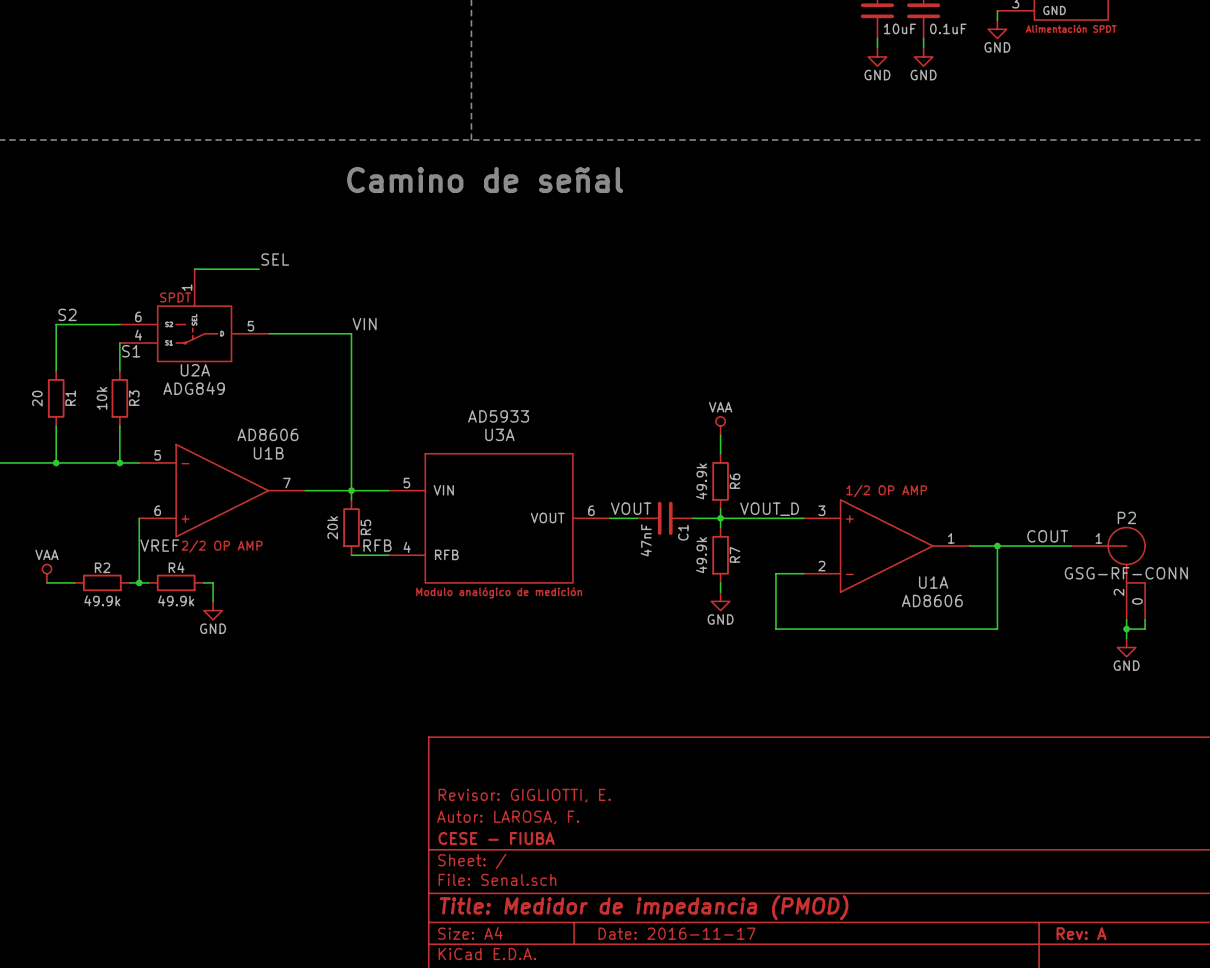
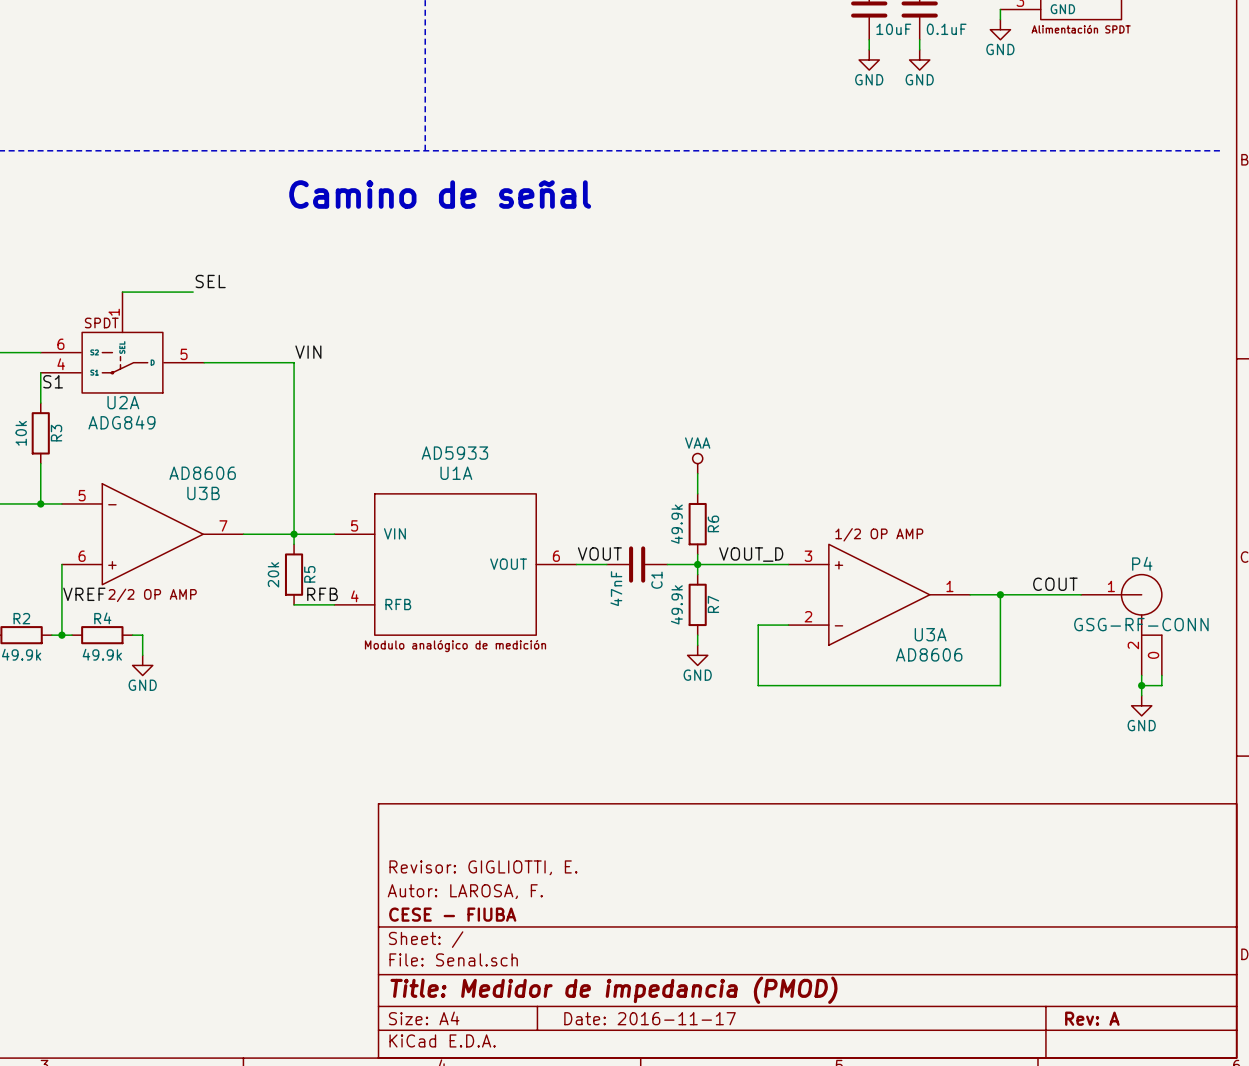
U3A name: U3A (499, 434) -> U1A (456, 473)
U1B name: U1B (268, 453) -> U3B (203, 493)
P2 name: P2 (1126, 517) -> P4 (1142, 563)
U1A name: U1A (933, 582) -> U3A (930, 634)

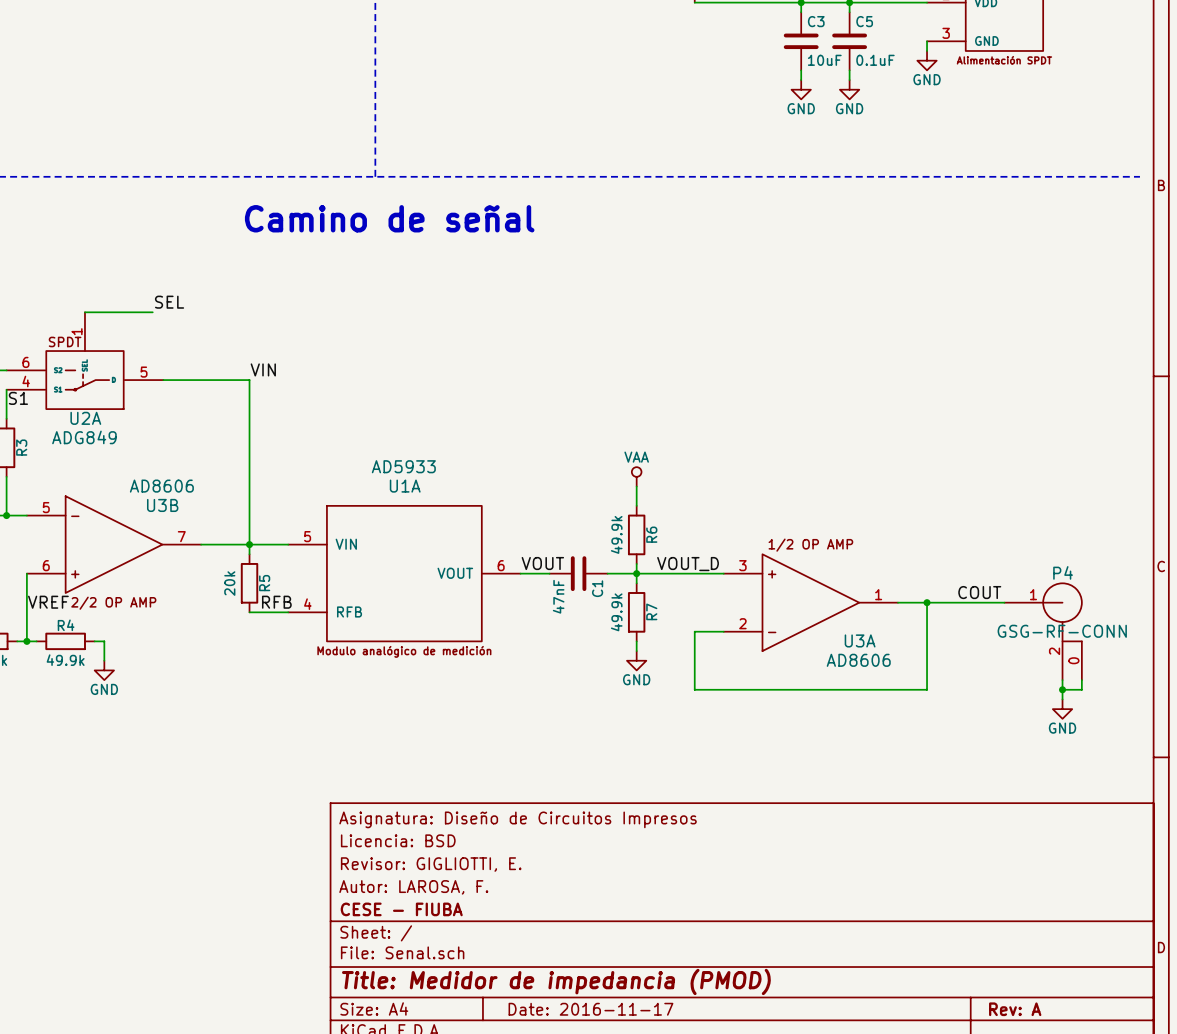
title block: none -> Asignatura: Diseño de Circuitos Impresos (518, 819)
title block: none -> Licencia: BSD (398, 840)

